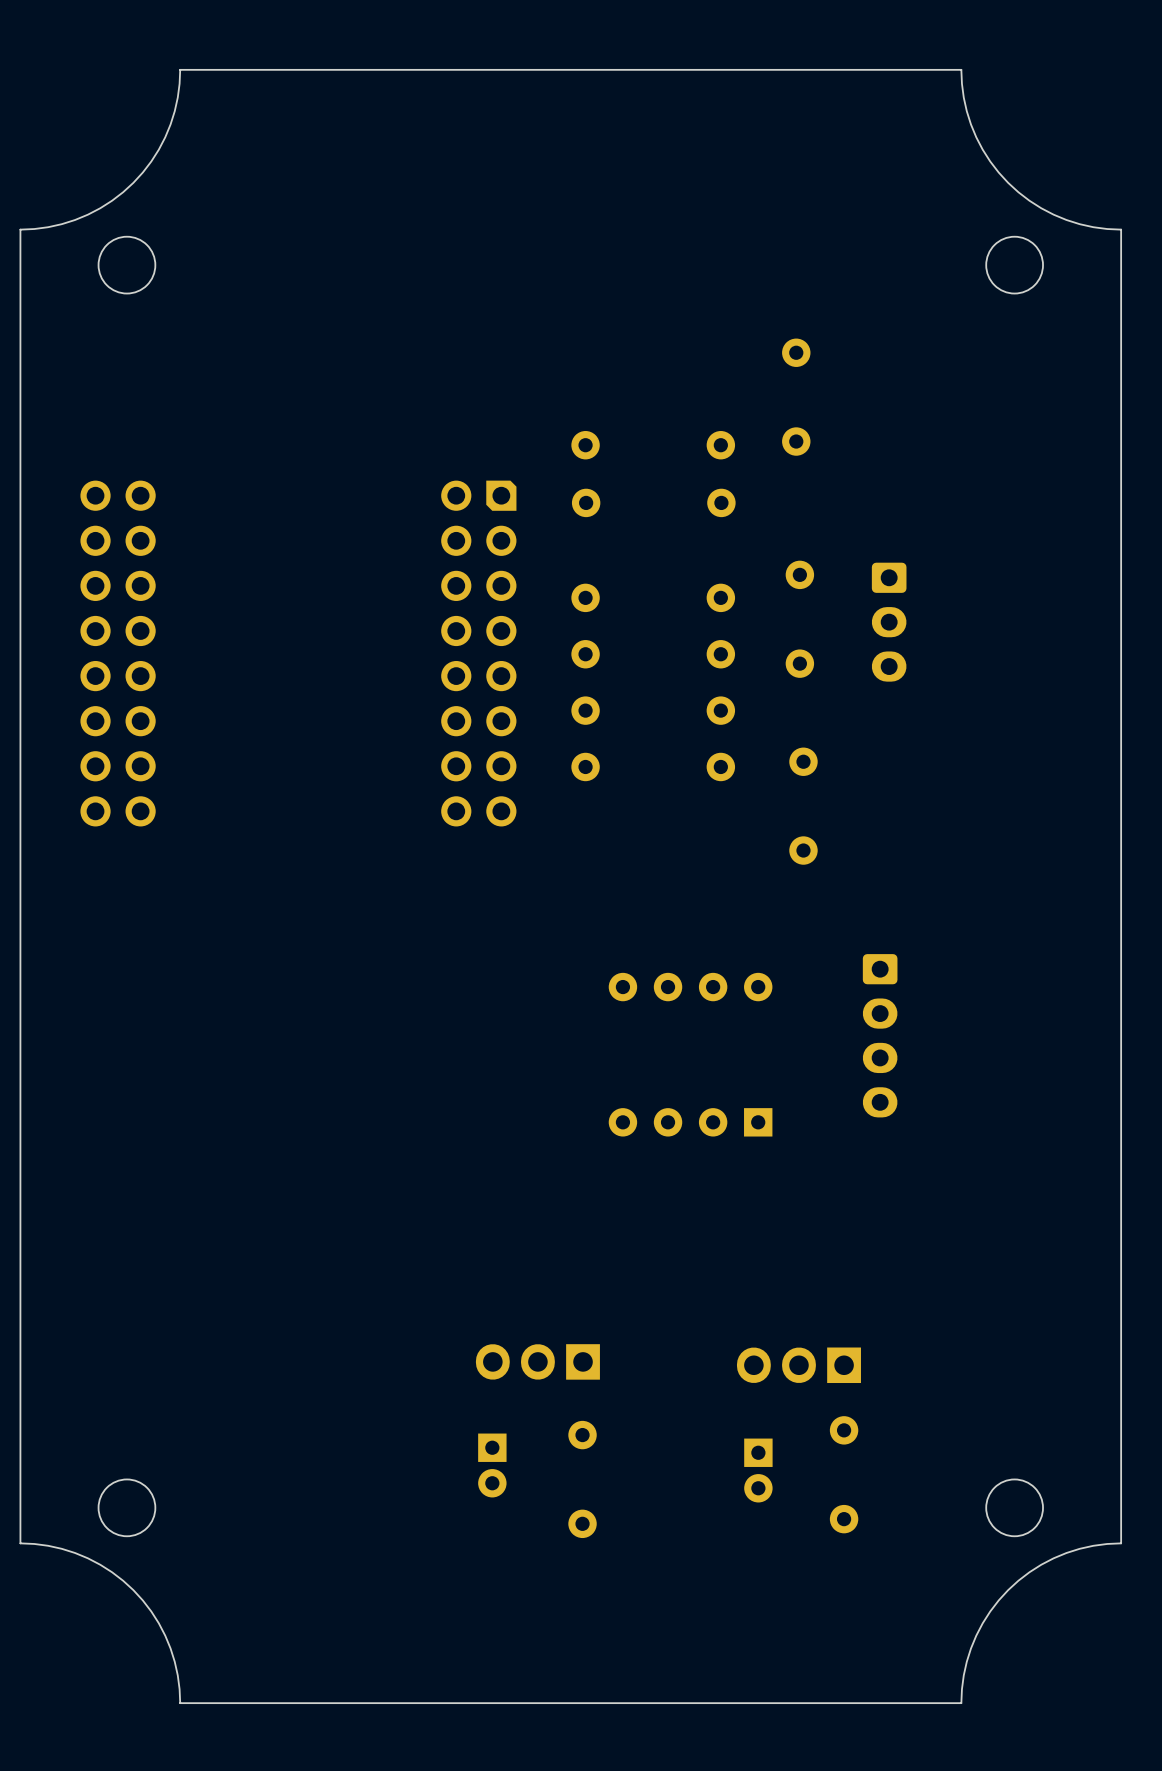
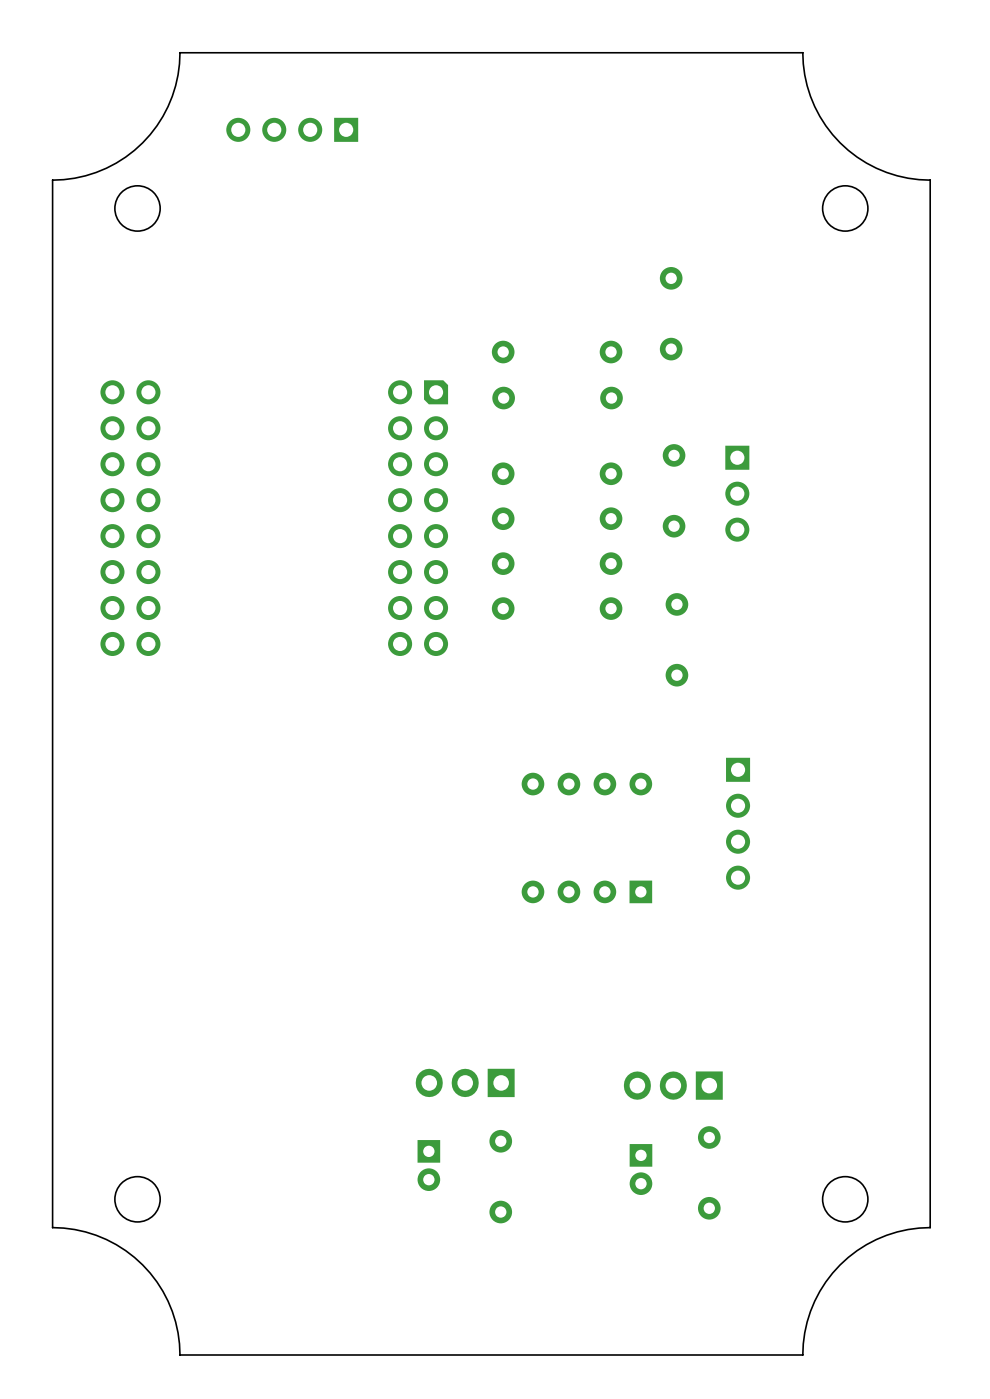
part: none -> (292, 129)
part footprint: [871, 562, 907, 682] -> [725, 445, 750, 542]
part footprint: [862, 954, 898, 1118] -> [726, 757, 751, 890]

